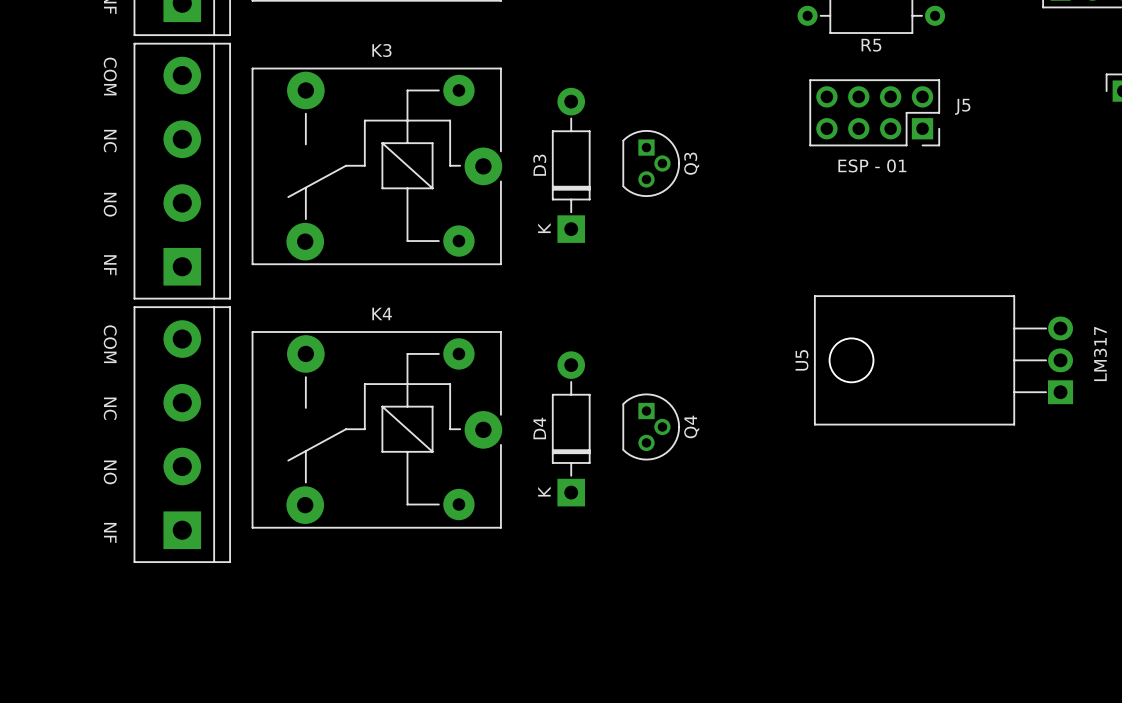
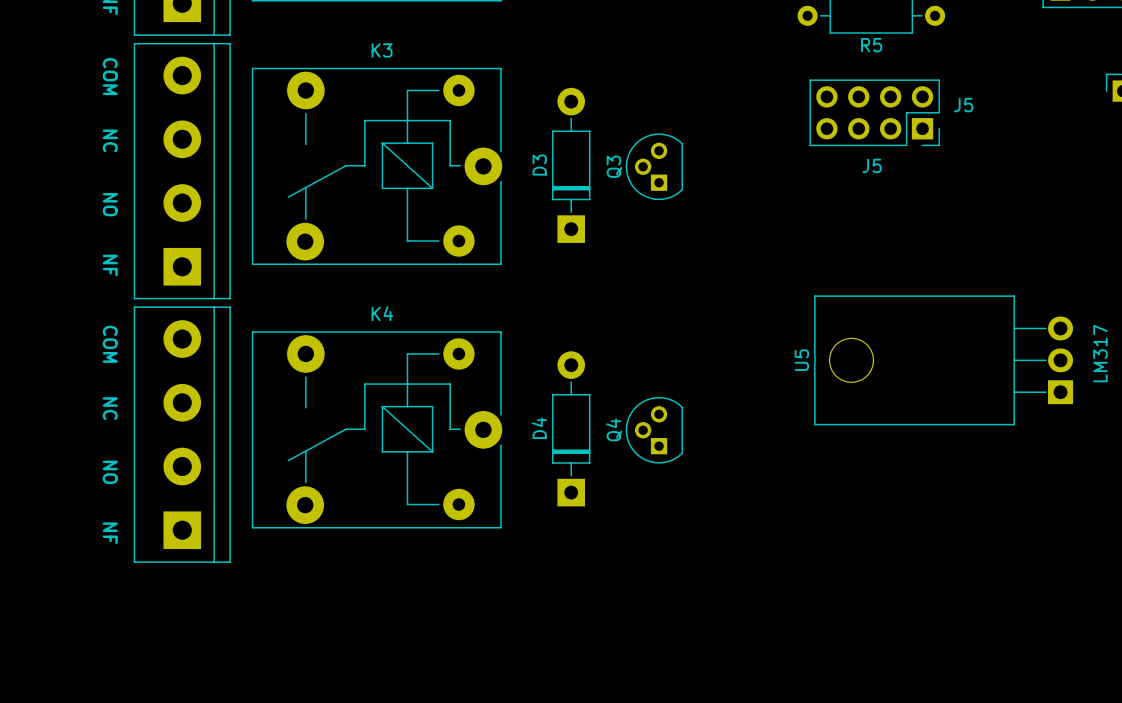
Q3 rotation: 0° (651, 163) -> 180° (654, 166)
ESP - 01 name: ESP - 01 (872, 165) -> J5 (872, 165)
D3 text: K (544, 228) -> none
Q4 rotation: 0° (651, 426) -> 180° (654, 430)
D4 text: K (544, 491) -> none

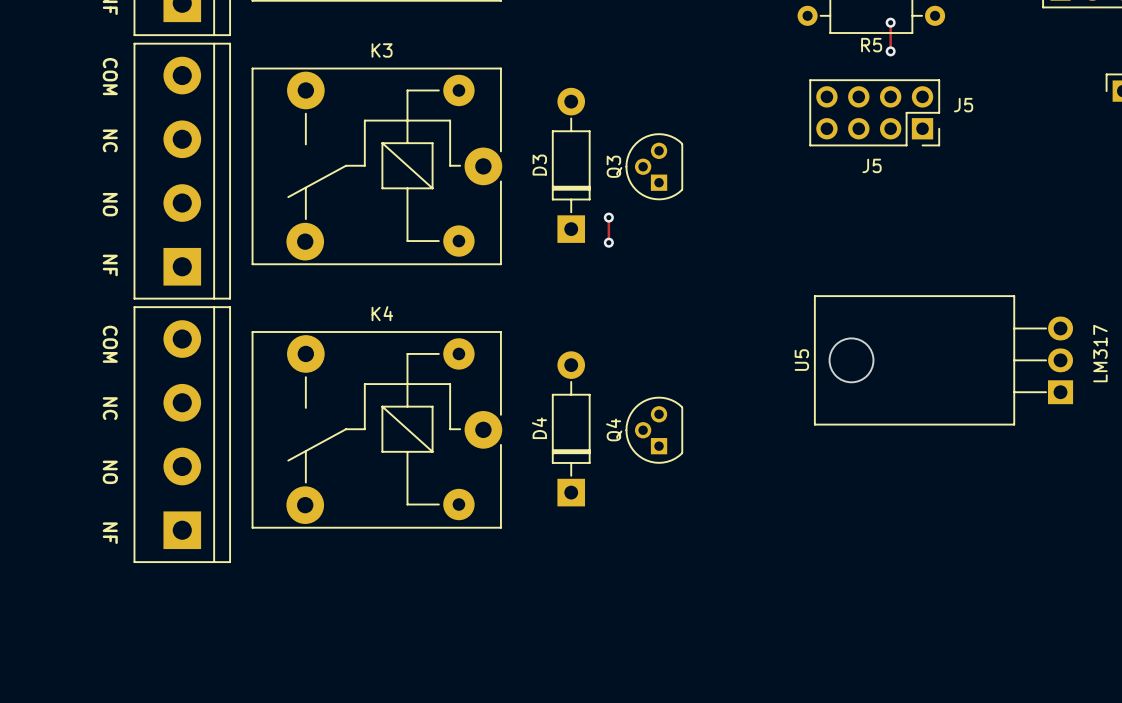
track: none -> (890, 22) (890, 51)
via: none -> (890, 22)
via: none -> (890, 51)
track: none -> (608, 217) (608, 242)
via: none -> (608, 217)
via: none -> (608, 242)

